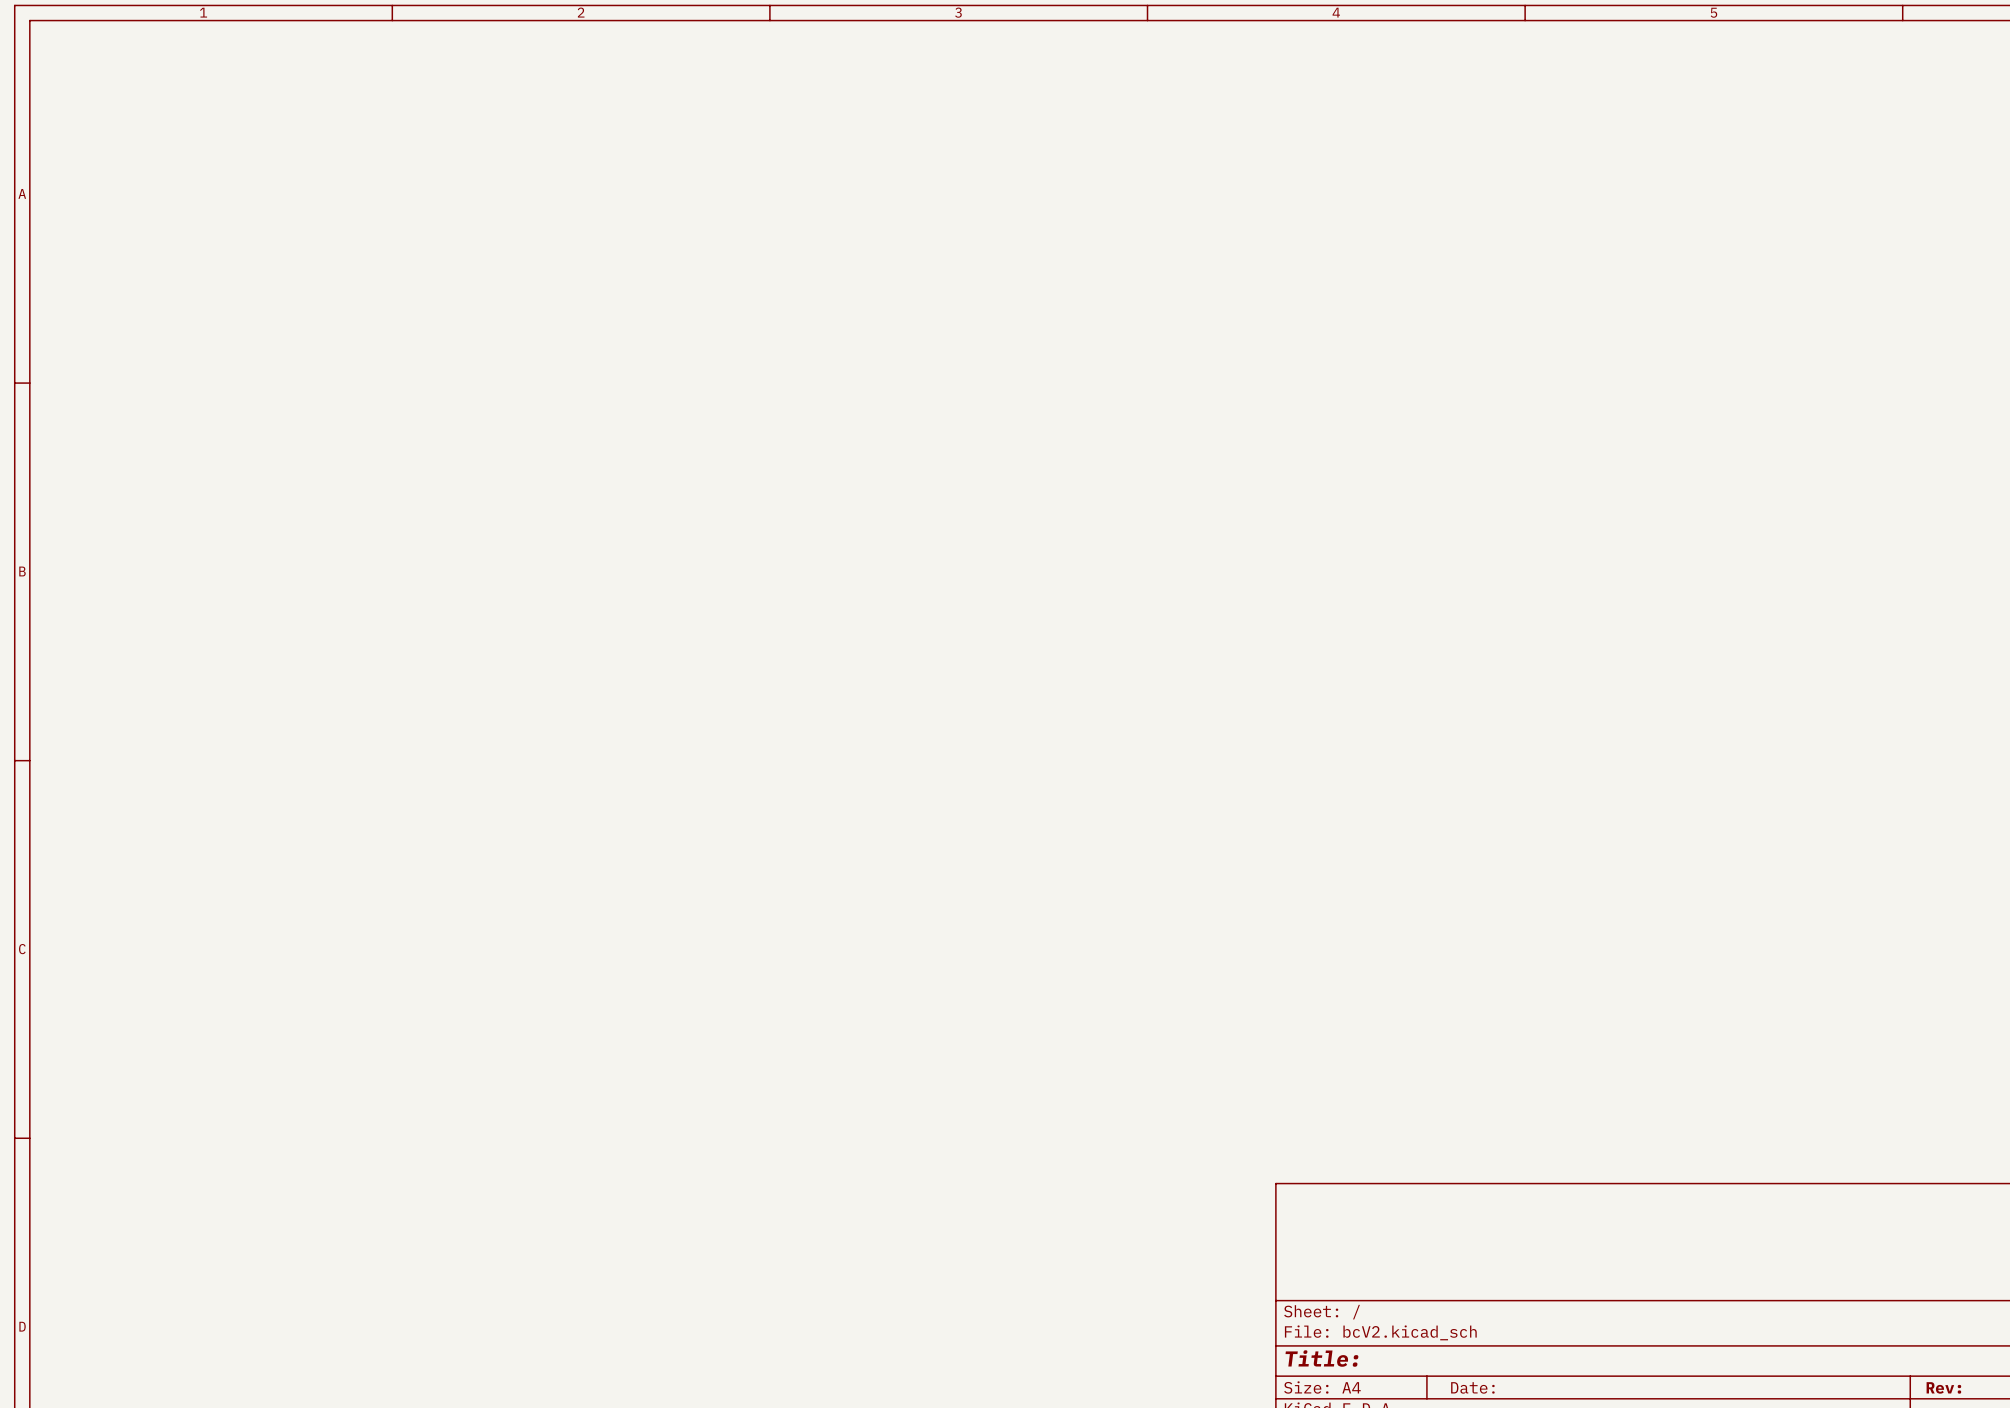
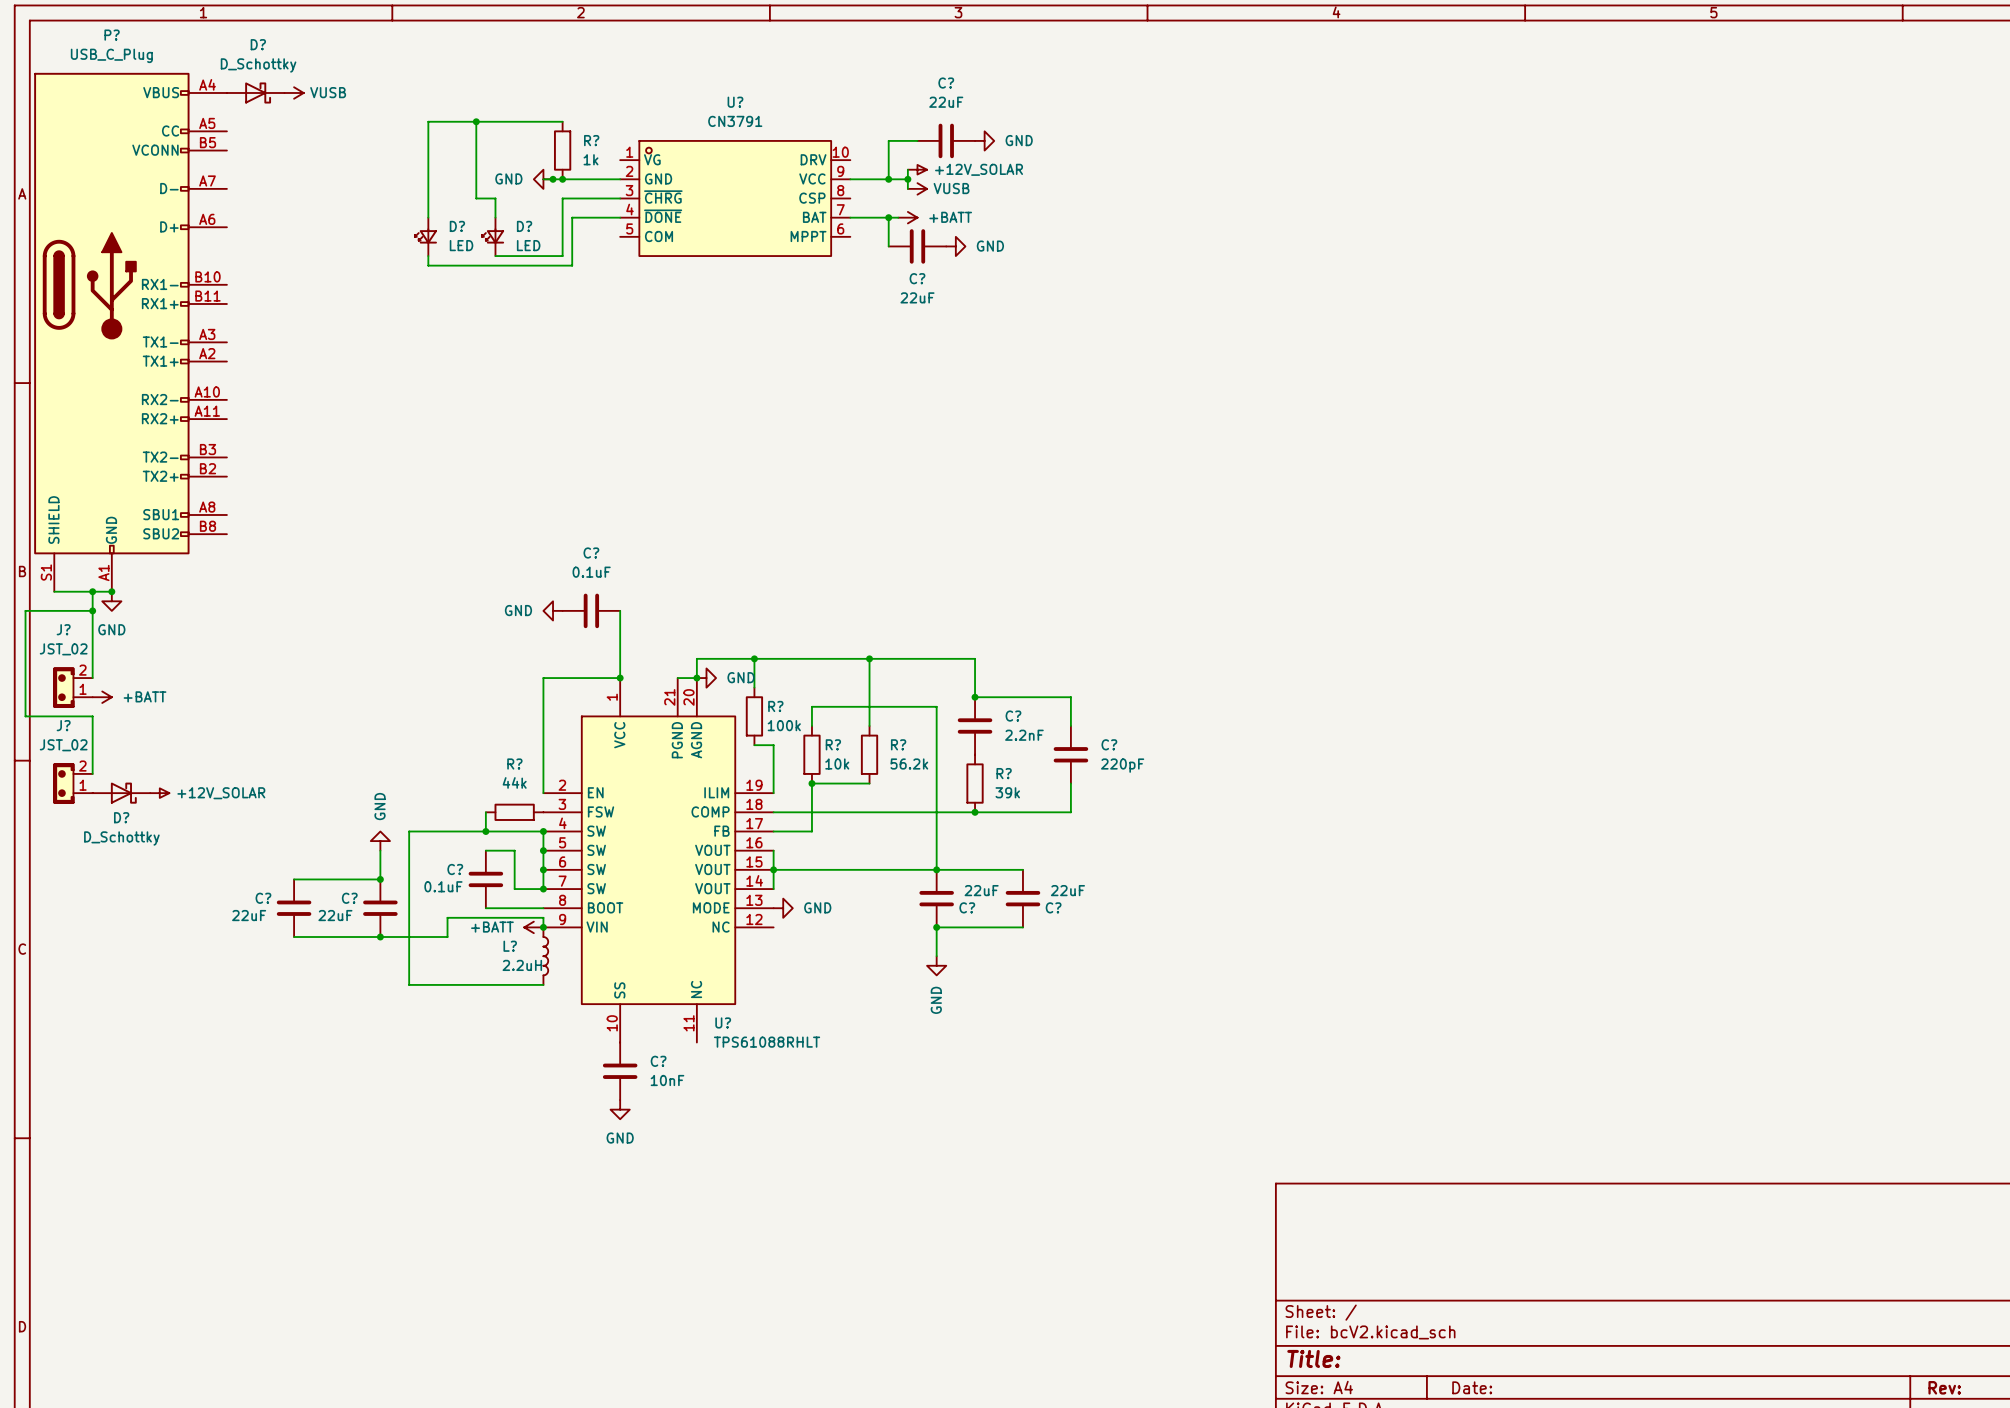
D?: none -> D_Schottky (255, 92)
power symbol: none -> VUSB (294, 92)
wire: none -> (476, 121) (476, 198) (495, 198) (495, 217)
junction: none -> (476, 121)
wire: none -> (562, 121) (428, 121) (428, 217)
wire: none -> (917, 140) (888, 140) (888, 179)
C?: none -> 22uF (946, 140)
power symbol: none -> GND (984, 140)
R?: none -> 1k (562, 150)
wire: none -> (907, 169) (907, 188)
power symbol: none -> +12V_SOLAR (917, 169)
wire: none -> (543, 179) (620, 179)
power symbol: none -> GND (543, 179)
junction: none -> (553, 179)
junction: none -> (562, 179)
wire: none -> (850, 179) (907, 179)
junction: none -> (888, 179)
junction: none -> (907, 179)
power symbol: none -> VUSB (917, 188)
wire: none -> (620, 198) (562, 198) (562, 256) (495, 256)
U?: none -> CN3791 (735, 198)
wire: none -> (620, 217) (572, 217) (572, 265) (428, 265) (428, 256)
wire: none -> (850, 217) (898, 217)
wire: none -> (888, 217) (888, 246)
junction: none -> (888, 217)
power symbol: none -> +BATT (907, 217)
D?: none -> LED (425, 236)
D?: none -> LED (493, 236)
C?: none -> 22uF (917, 246)
power symbol: none -> GND (955, 246)
P?: none -> USB_C_Plug (130, 332)
wire: none -> (54, 591) (111, 591)
wire: none -> (92, 591) (92, 678)
junction: none -> (92, 591)
junction: none -> (111, 591)
power symbol: none -> GND (111, 601)
wire: none -> (92, 610) (25, 610) (25, 716) (92, 716) (92, 773)
junction: none -> (92, 610)
power symbol: none -> GND (553, 610)
C?: none -> 0.1uF (591, 610)
wire: none -> (620, 610) (620, 678) (543, 678) (543, 793)
wire: none -> (754, 658) (754, 687)
junction: none -> (754, 658)
wire: none -> (869, 658) (869, 725)
junction: none -> (869, 658)
junction: none -> (620, 678)
wire: none -> (677, 678) (696, 678) (696, 658) (975, 658) (975, 697) (1070, 697) (1070, 725)
junction: none -> (696, 678)
power symbol: none -> GND (706, 678)
J?: none -> JST_02 (73, 687)
power symbol: none -> +BATT (102, 697)
junction: none -> (975, 697)
R?: none -> 100k (754, 716)
wire: none -> (811, 725) (811, 706) (936, 706) (936, 869)
C?: none -> 2.2nF (975, 725)
wire: none -> (754, 745) (773, 745) (773, 793)
R?: none -> 10k (811, 754)
R?: none -> 56.2k (869, 754)
C?: none -> 220pF (1070, 754)
J?: none -> JST_02 (73, 783)
junction: none -> (811, 783)
wire: none -> (869, 783) (811, 783) (811, 831) (773, 831)
R?: none -> 39k (975, 783)
wire: none -> (1070, 783) (1070, 812) (773, 812)
D?: none -> D_Schottky (121, 793)
power symbol: none -> +12V_SOLAR (159, 793)
wire: none -> (485, 812) (485, 831)
R?: none -> 44k (514, 812)
junction: none -> (975, 812)
junction: none -> (485, 831)
junction: none -> (543, 831)
power symbol: none -> GND (380, 841)
wire: none -> (380, 850) (380, 879) (294, 879)
wire: none -> (485, 850) (514, 850) (514, 889) (543, 889) (543, 831) (409, 831) (409, 984) (543, 984)
junction: none -> (543, 850)
wire: none -> (773, 850) (773, 889)
U?: none -> TPS61088RHLT (658, 860)
junction: none -> (543, 869)
wire: none -> (773, 869) (1022, 869)
junction: none -> (773, 869)
junction: none -> (936, 869)
junction: none -> (380, 879)
C?: none -> 0.1uF (485, 879)
junction: none -> (543, 889)
C?: none -> 22uF (936, 898)
C?: none -> 22uF (1022, 898)
C?: none -> 22uF (294, 908)
C?: none -> 22uF (380, 908)
wire: none -> (485, 908) (543, 908)
power symbol: none -> GND (783, 908)
power symbol: none -> +BATT (533, 927)
wire: none -> (543, 927) (543, 917) (447, 917) (447, 937) (294, 937)
junction: none -> (543, 927)
junction: none -> (936, 927)
wire: none -> (1022, 927) (936, 927) (936, 956)
junction: none -> (380, 937)
L?: none -> 2.2uH (545, 956)
power symbol: none -> GND (936, 965)
C?: none -> 10nF (620, 1071)
power symbol: none -> GND (620, 1109)

